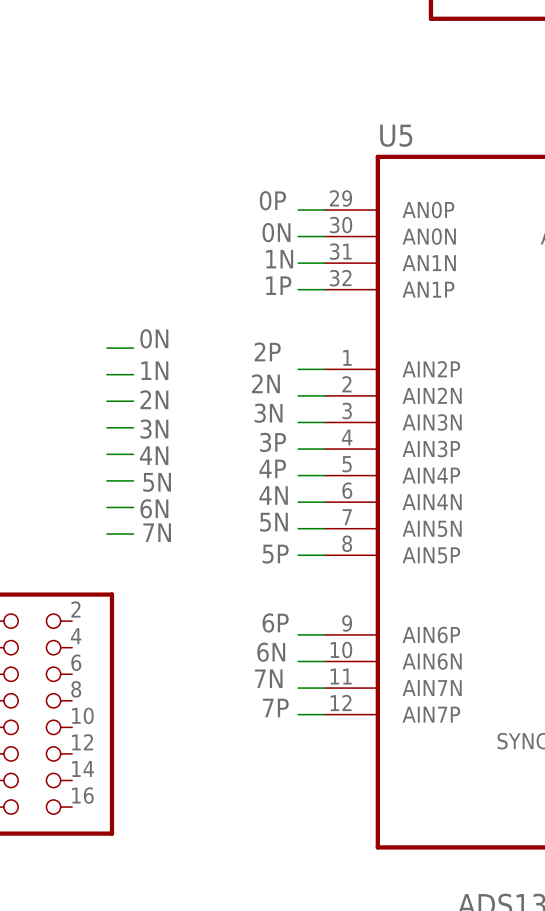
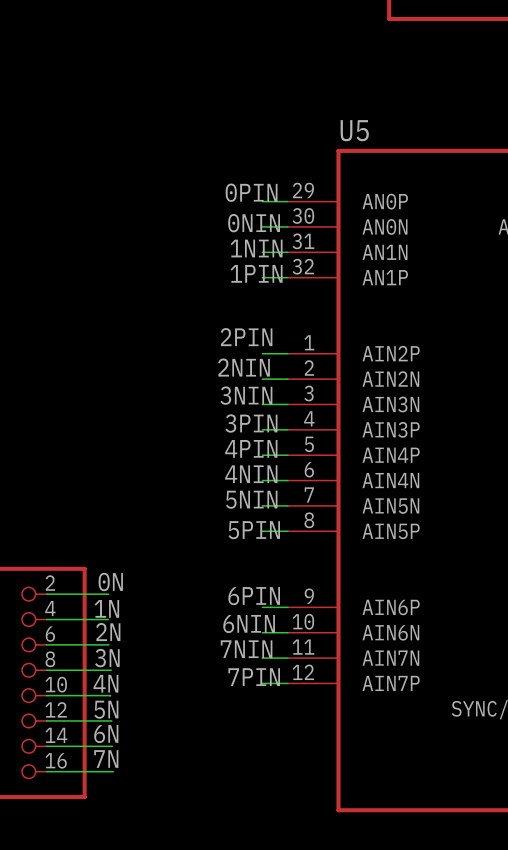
label: 0P (272, 200) -> 0PIN (251, 192)
label: 0N (276, 232) -> 0NIN (254, 223)
label: 1N (279, 259) -> 1NIN (256, 248)
label: 1P (278, 285) -> 1PIN (256, 273)
label: 0N (154, 338) -> none
wire: (106, 348) (133, 348) -> none
label: 2P (267, 351) -> 2PIN (246, 337)
label: 1N (154, 370) -> none
wire: (106, 374) (133, 374) -> none
label: 2N (265, 383) -> 2NIN (244, 367)
label: 2N (154, 399) -> none
wire: (106, 401) (133, 401) -> none
label: 3N (268, 413) -> 3NIN (246, 395)
wire: (106, 427) (133, 427) -> none
label position: 3N (154, 429) -> 3N (107, 658)
label: 3P (273, 442) -> 3PIN (251, 423)
wire: (106, 454) (133, 454) -> none
label position: 4N (154, 455) -> 4N (105, 683)
label: 4P (272, 468) -> 4PIN (251, 448)
wire: (106, 480) (133, 480) -> none
label position: 5N (157, 482) -> 5N (106, 709)
label: 4N (273, 495) -> 4NIN (251, 474)
wire: (106, 507) (133, 507) -> none
label position: 6N (154, 508) -> 6N (106, 734)
label: 5N (273, 522) -> 5NIN (251, 499)
label: 7N (157, 532) -> none
wire: (106, 534) (133, 534) -> none
label: 5P (275, 554) -> 5PIN (254, 530)
label: none -> 0N (110, 582)
wire: none -> (46, 594) (108, 594)
label: 6P (275, 623) -> 6PIN (254, 596)
label: none -> 1N (106, 608)
wire: none -> (46, 619) (108, 619)
label: 6N (271, 652) -> 6NIN (249, 624)
label: none -> 2N (108, 632)
wire: none -> (46, 644) (108, 644)
label: 7N (268, 678) -> 7NIN (246, 649)
wire: none -> (46, 670) (111, 670)
label: 7P (275, 707) -> 7PIN (254, 677)
wire: none -> (46, 695) (110, 695)
wire: none -> (46, 720) (111, 720)
wire: none -> (46, 746) (112, 746)
label: none -> 7N (106, 759)
wire: none -> (46, 771) (113, 771)

